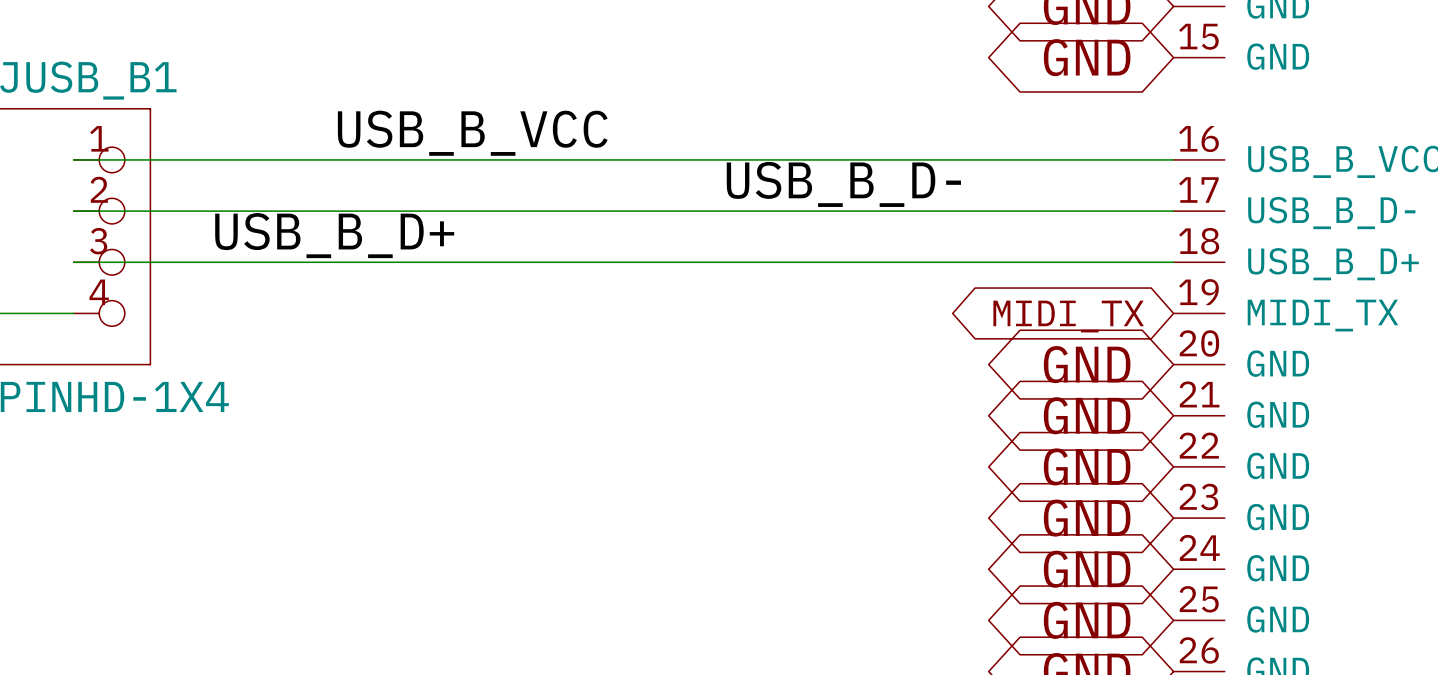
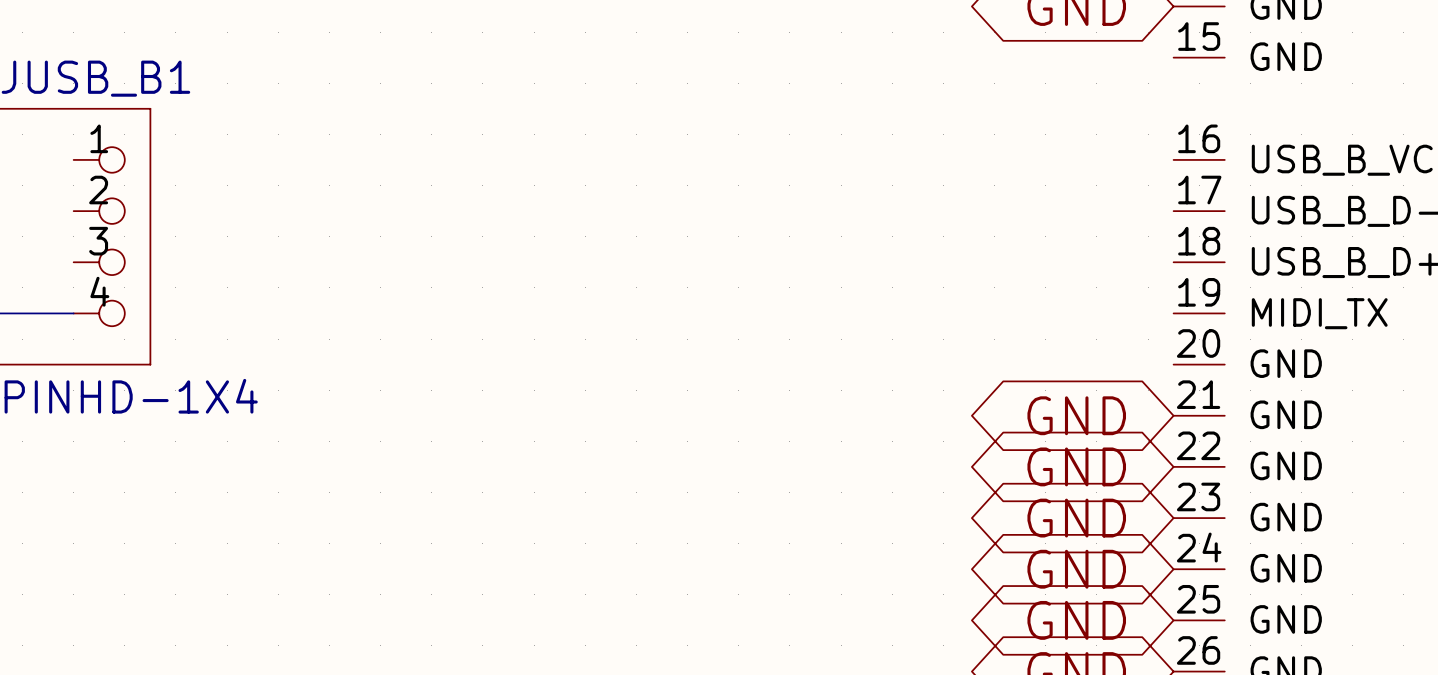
global label: GND (1087, 57) -> none
label: USB_B_VCC (472, 133) -> none
wire: (73, 159) (1173, 159) -> none
label: USB_B_D- (843, 184) -> none
wire: (73, 211) (1173, 211) -> none
label: USB_B_D+ (334, 235) -> none
wire: (73, 262) (1173, 262) -> none
global label: MIDI_TX (1068, 316) -> none
global label: GND (1087, 364) -> none

